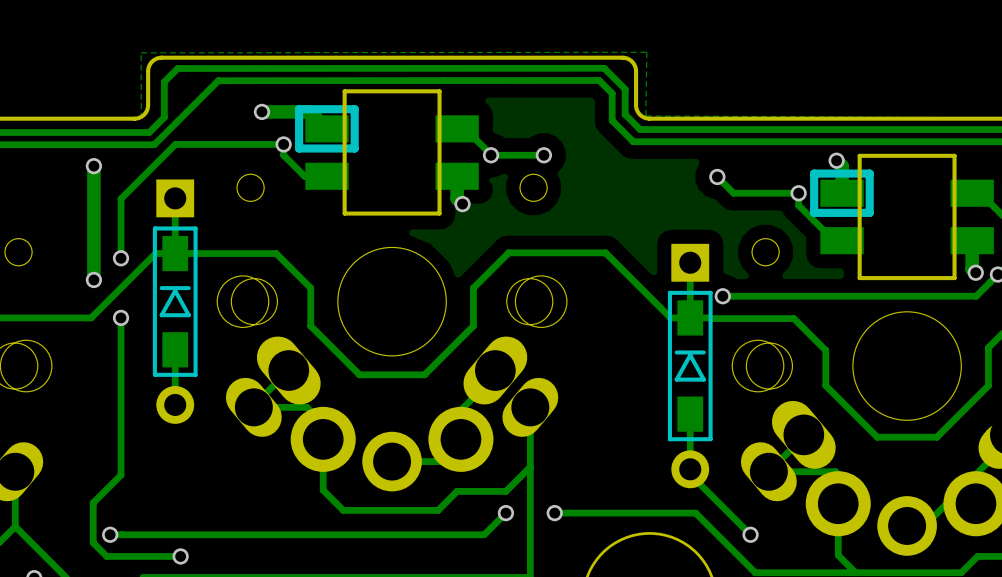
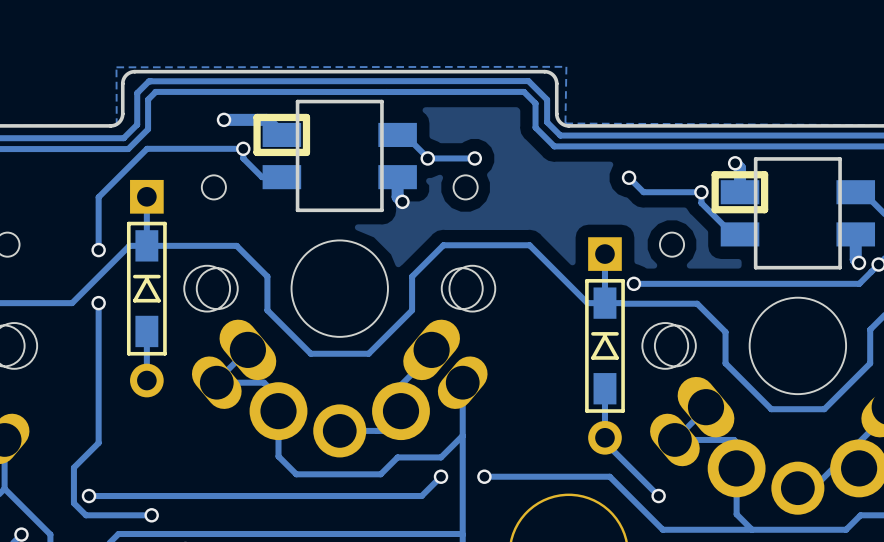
track: none -> (155, 92) (148, 99) (148, 129)
track: (444, 80) (218, 80) (176, 122) -> (386, 92) (155, 91)
track: (93, 166) (93, 279) -> none
via: (93, 166) -> none
via: (93, 279) -> none

